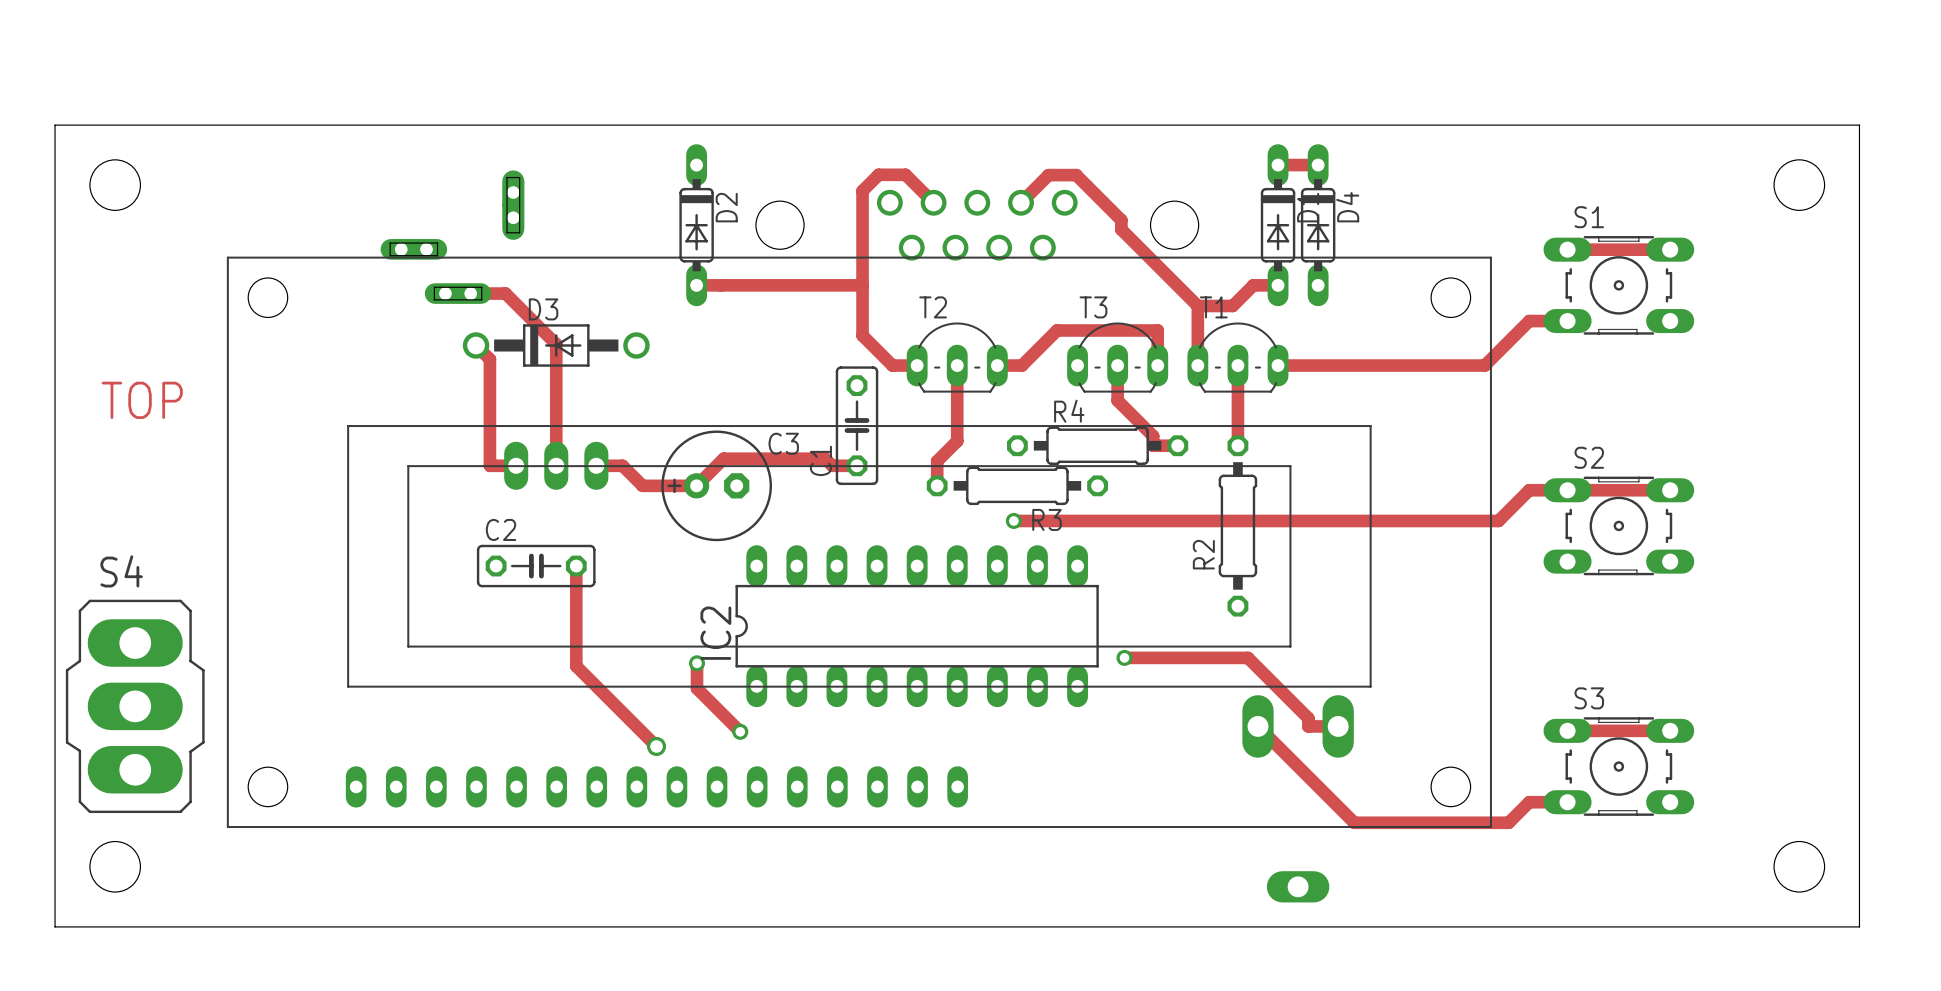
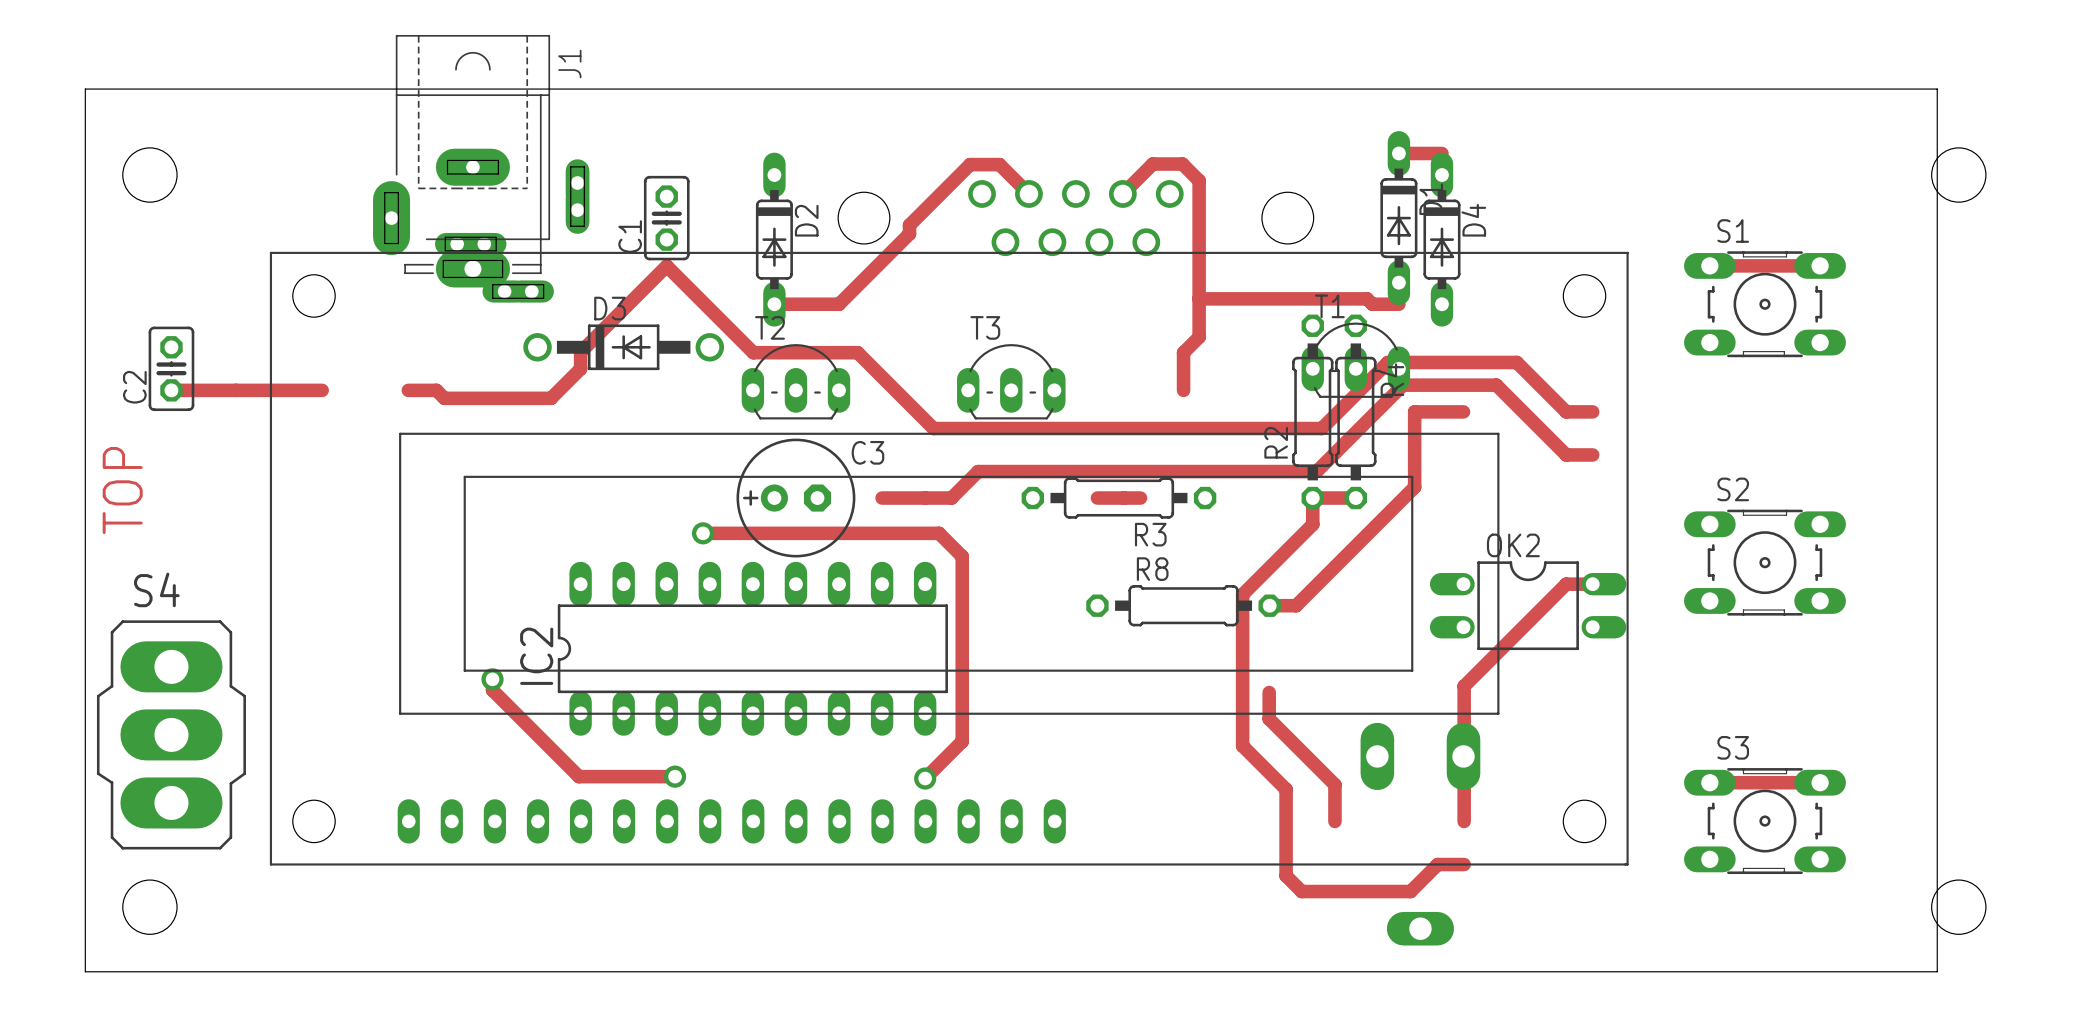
board edge: (55, 125) (1859, 125) (1859, 926) (1779, 926) -> (85, 110) (85, 89) (1937, 89) (1937, 971)
J1: none -> (461, 161)
track: (906, 175) (878, 174) (862, 190) (862, 335) (892, 365) (917, 365) -> (999, 164) (970, 164) (909, 225) (909, 233) (839, 304) (774, 304)
track: (1048, 175) (1076, 175) (1121, 220) (1121, 229) (1197, 305) -> (1152, 164) (1182, 164) (1199, 180) (1199, 337) (1183, 352) (1183, 390)
D2 position: (696, 225) -> (774, 239)
D4 position: (1318, 225) -> (1441, 239)
track: (1567, 249) (1670, 249) -> (1709, 265) (1820, 265)
track: (696, 285) (862, 285) -> none
track: (1278, 285) (1253, 285) (1232, 305) (1197, 305) -> none
S1 position: (1618, 285) -> (1764, 304)
track: (470, 293) (505, 293) (556, 344) (556, 465) -> none
track: none -> (1199, 298) (1367, 298) (1372, 304) (1398, 304)
track: (1197, 305) (1197, 365) -> none
track: (1567, 321) (1529, 321) (1484, 365) (1278, 365) -> none
track: (476, 345) (489, 359) (489, 465) (516, 465) -> none
T2 position: (957, 357) -> (795, 381)
T3 position: (1117, 357) -> (1011, 381)
track: (957, 365) (957, 441) (937, 461) (937, 485) -> none
track: (997, 365) (1021, 365) (1057, 330) (1157, 330) (1157, 365) -> none
track: (1117, 365) (1117, 400) (1153, 436) (1153, 445) (1177, 445) -> none
track: (1237, 365) (1237, 445) -> none
C1 footprint: [835, 366, 879, 486] -> [643, 175, 690, 261]
track: none -> (171, 390) (322, 390)
track: none -> (408, 390) (436, 390) (444, 398) (551, 398) (580, 368) (580, 352) (666, 266) (753, 352) (857, 352) (933, 428) (1321, 428) (1387, 362) (1516, 362) (1566, 411) (1592, 411)
text rotation: 0° (142, 400) -> 90° counterclockwise (122, 490)
track: none -> (1463, 411) (1414, 411) (1414, 487) (1296, 605) (1269, 605)
R4 rotation: 0° (1097, 445) -> 90° clockwise (1355, 411)
R4 position: (1097, 445) -> (1355, 411)
track: none -> (1592, 454) (1566, 454) (1496, 385) (1403, 385) (1316, 471) (978, 471) (951, 498) (882, 498)
part: (556, 465) -> none
track: (596, 465) (622, 465) (642, 485) (696, 485) (723, 458) (825, 458) (832, 465) (857, 465) -> none
track: none -> (1097, 498) (1140, 498)
track: none -> (1355, 498) (1312, 498) (1312, 524) (1242, 594) (1242, 746) (1286, 789) (1286, 875) (1301, 891) (1410, 891) (1437, 864) (1464, 864)
track: (1670, 490) (1529, 490) (1498, 520) (1013, 520) -> none
track: none -> (703, 533) (939, 533) (962, 556) (962, 741) (925, 778)
via: none -> (703, 533)
via: (1013, 520) -> none
R2 position: (1237, 525) -> (1312, 411)
S2 position: (1618, 525) -> (1764, 562)
C2 name position: C2 (501, 529) -> C2 (134, 387)
C2 footprint: [476, 544, 596, 588] -> [148, 326, 195, 412]
track: (576, 566) (576, 666) (656, 746) -> none
track: none -> (1592, 584) (1566, 584) (1464, 686) (1464, 821)
R8: none -> (1183, 605)
OK2: none -> (1528, 605)
IC2 position: (917, 626) -> (752, 648)
track: none -> (492, 679) (492, 690) (578, 776) (675, 776)
via: none -> (492, 679)
track: (1124, 657) (1247, 657) (1308, 718) (1308, 726) (1338, 726) -> none
via: (1124, 657) -> none
track: (697, 663) (697, 688) (740, 731) -> none
via: (697, 663) -> none
track: none -> (1269, 692) (1269, 719) (1334, 784) (1334, 821)
track: (1257, 726) (1354, 822) (1508, 822) (1529, 802) (1567, 802) -> none
track: (1567, 730) (1670, 730) -> (1709, 782) (1820, 782)
via: (740, 731) -> none
via: none -> (675, 776)
via: (656, 746) -> none
via: none -> (925, 778)
S3 position: (1618, 766) -> (1764, 821)

